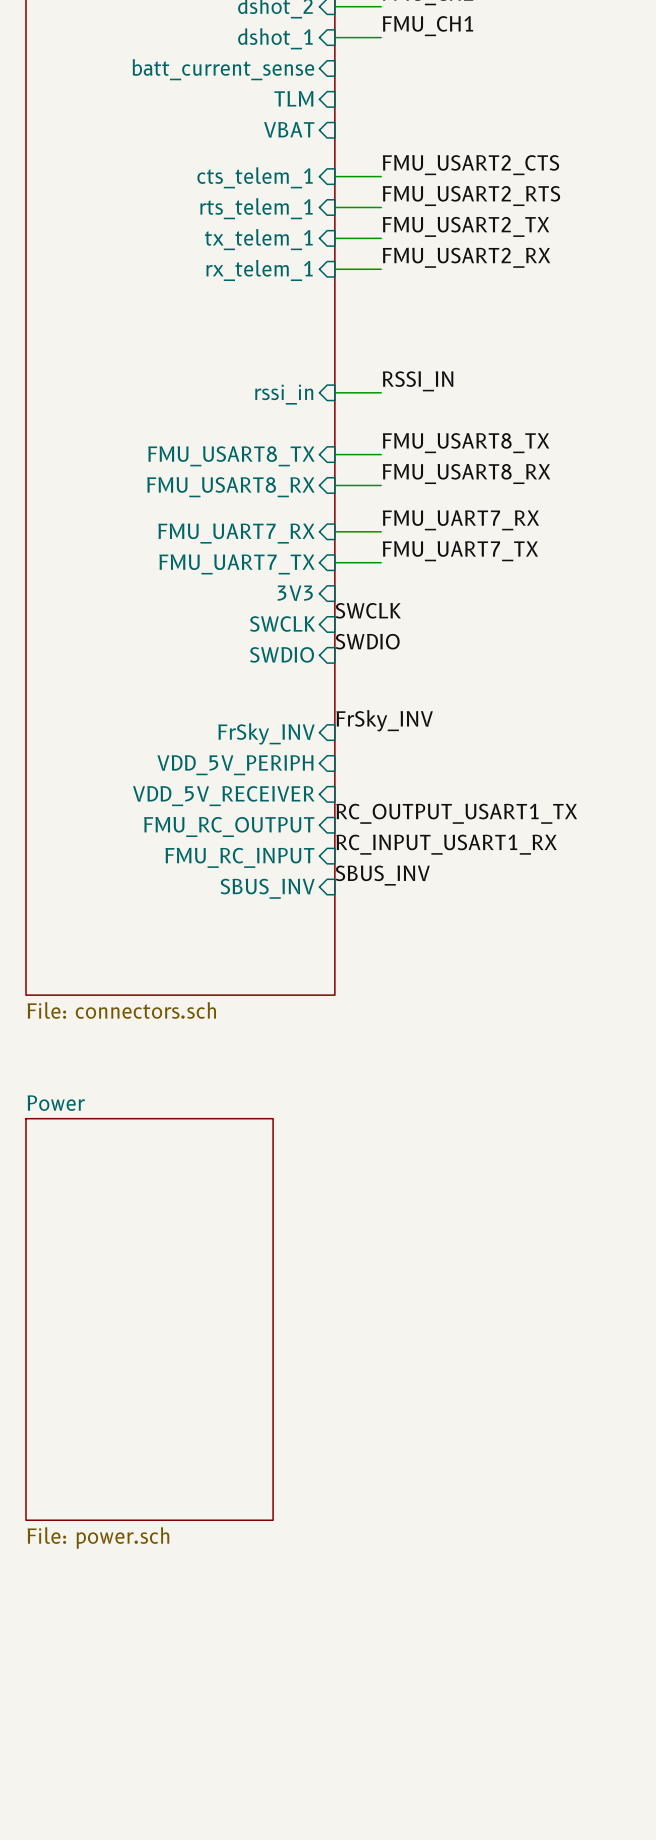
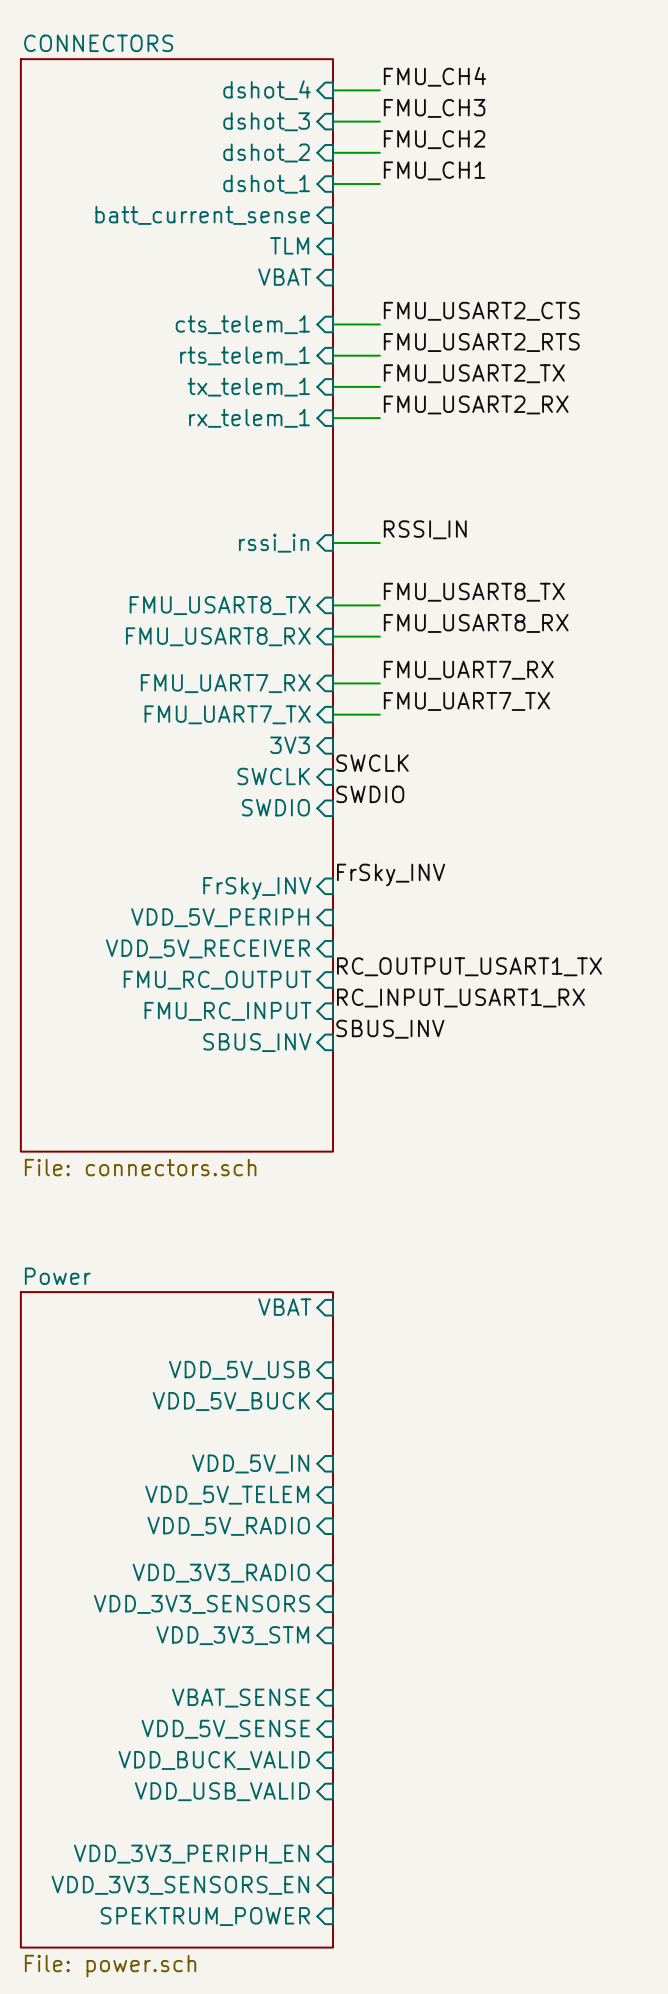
sheet pin: none -> VBAT (284, 1307)
sheet pin: none -> VDD_5V_USB (239, 1370)
sheet pin: none -> VDD_5V_BUCK (231, 1401)
sheet pin: none -> VDD_5V_IN (250, 1463)
sheet Power: File: power.sch (149, 1319) -> none
sheet pin: none -> VDD_5V_TELEM (227, 1495)
sheet pin: none -> VDD_5V_RADIO (228, 1526)
sheet pin: none -> VDD_3V3_RADIO (221, 1573)
sheet pin: none -> VDD_3V3_SENSORS (201, 1604)
sheet Power: none -> File: power.sch (176, 1619)
sheet pin: none -> VDD_3V3_STM (232, 1635)
sheet pin: none -> VBAT_SENSE (240, 1698)
sheet pin: none -> VDD_5V_SENSE (225, 1729)
sheet pin: none -> VDD_BUCK_VALID (214, 1760)
sheet pin: none -> VDD_USB_VALID (222, 1791)
sheet pin: none -> VDD_3V3_PERIPH_EN (191, 1854)
sheet pin: none -> VDD_3V3_SENSORS_EN (180, 1885)
sheet pin: none -> SPEKTRUM_POWER (205, 1916)

